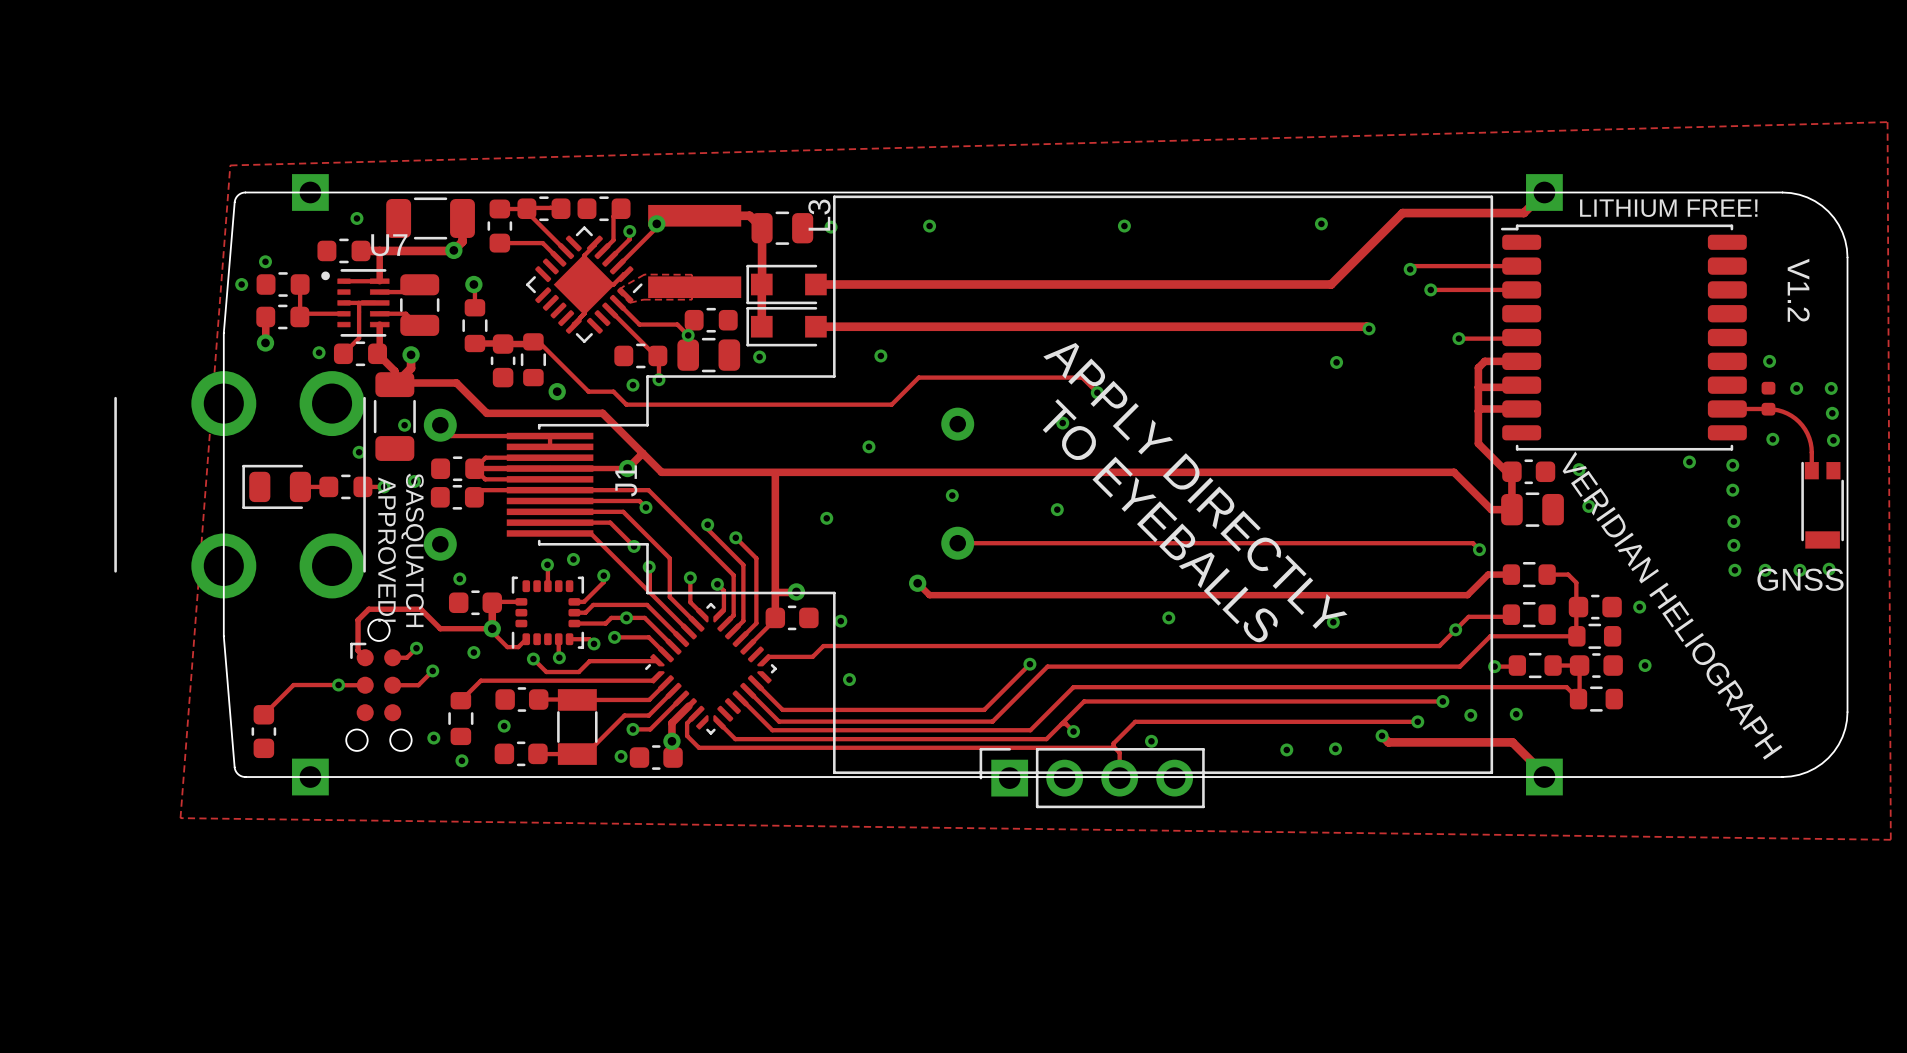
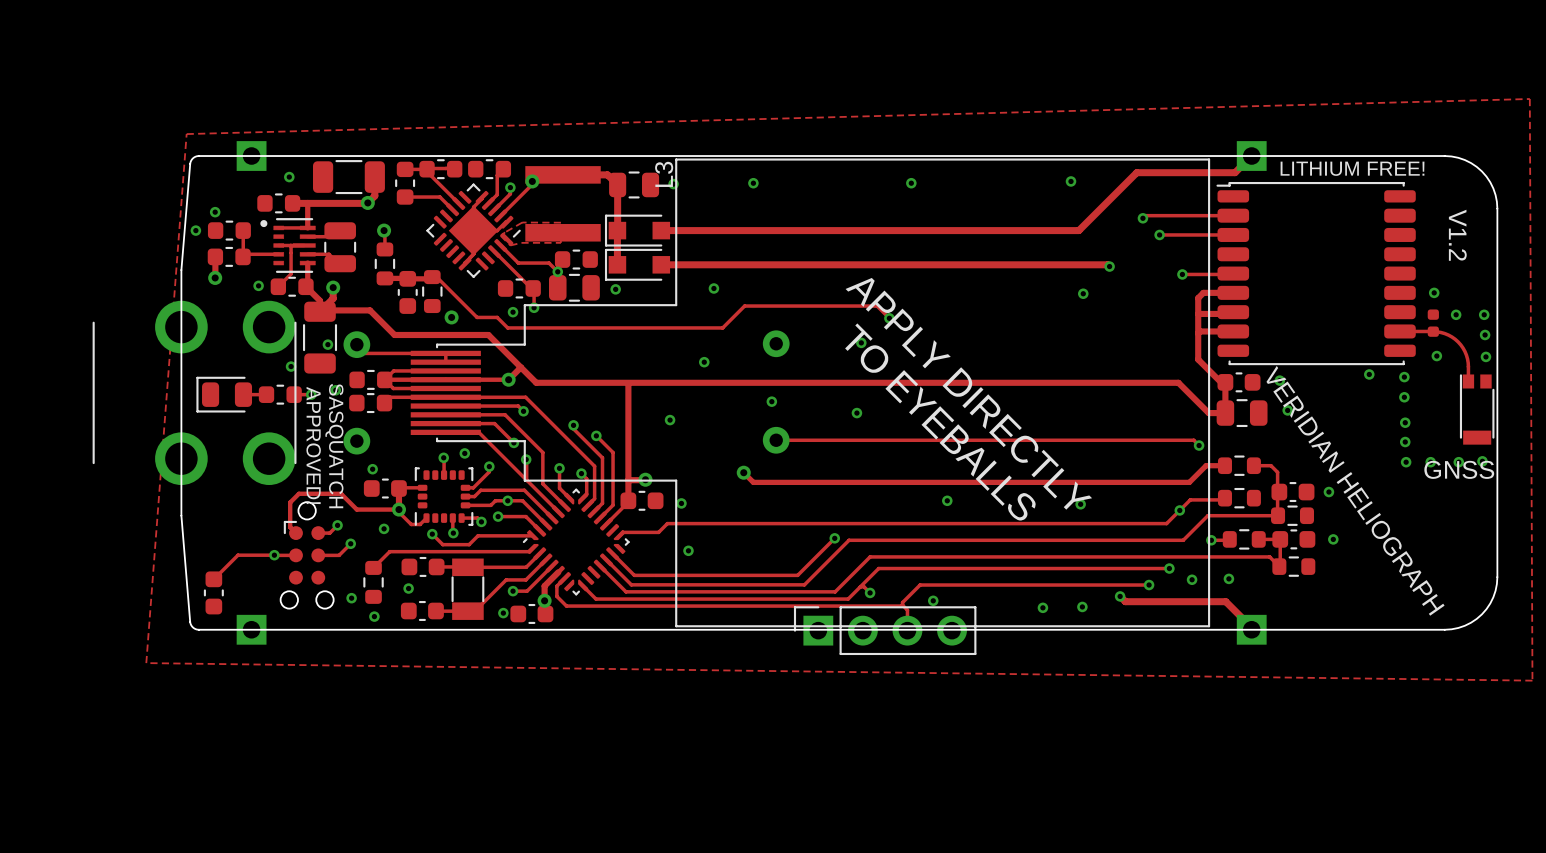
U7 name: U7 (389, 245) -> none
J1 name: J1 (626, 480) -> none

